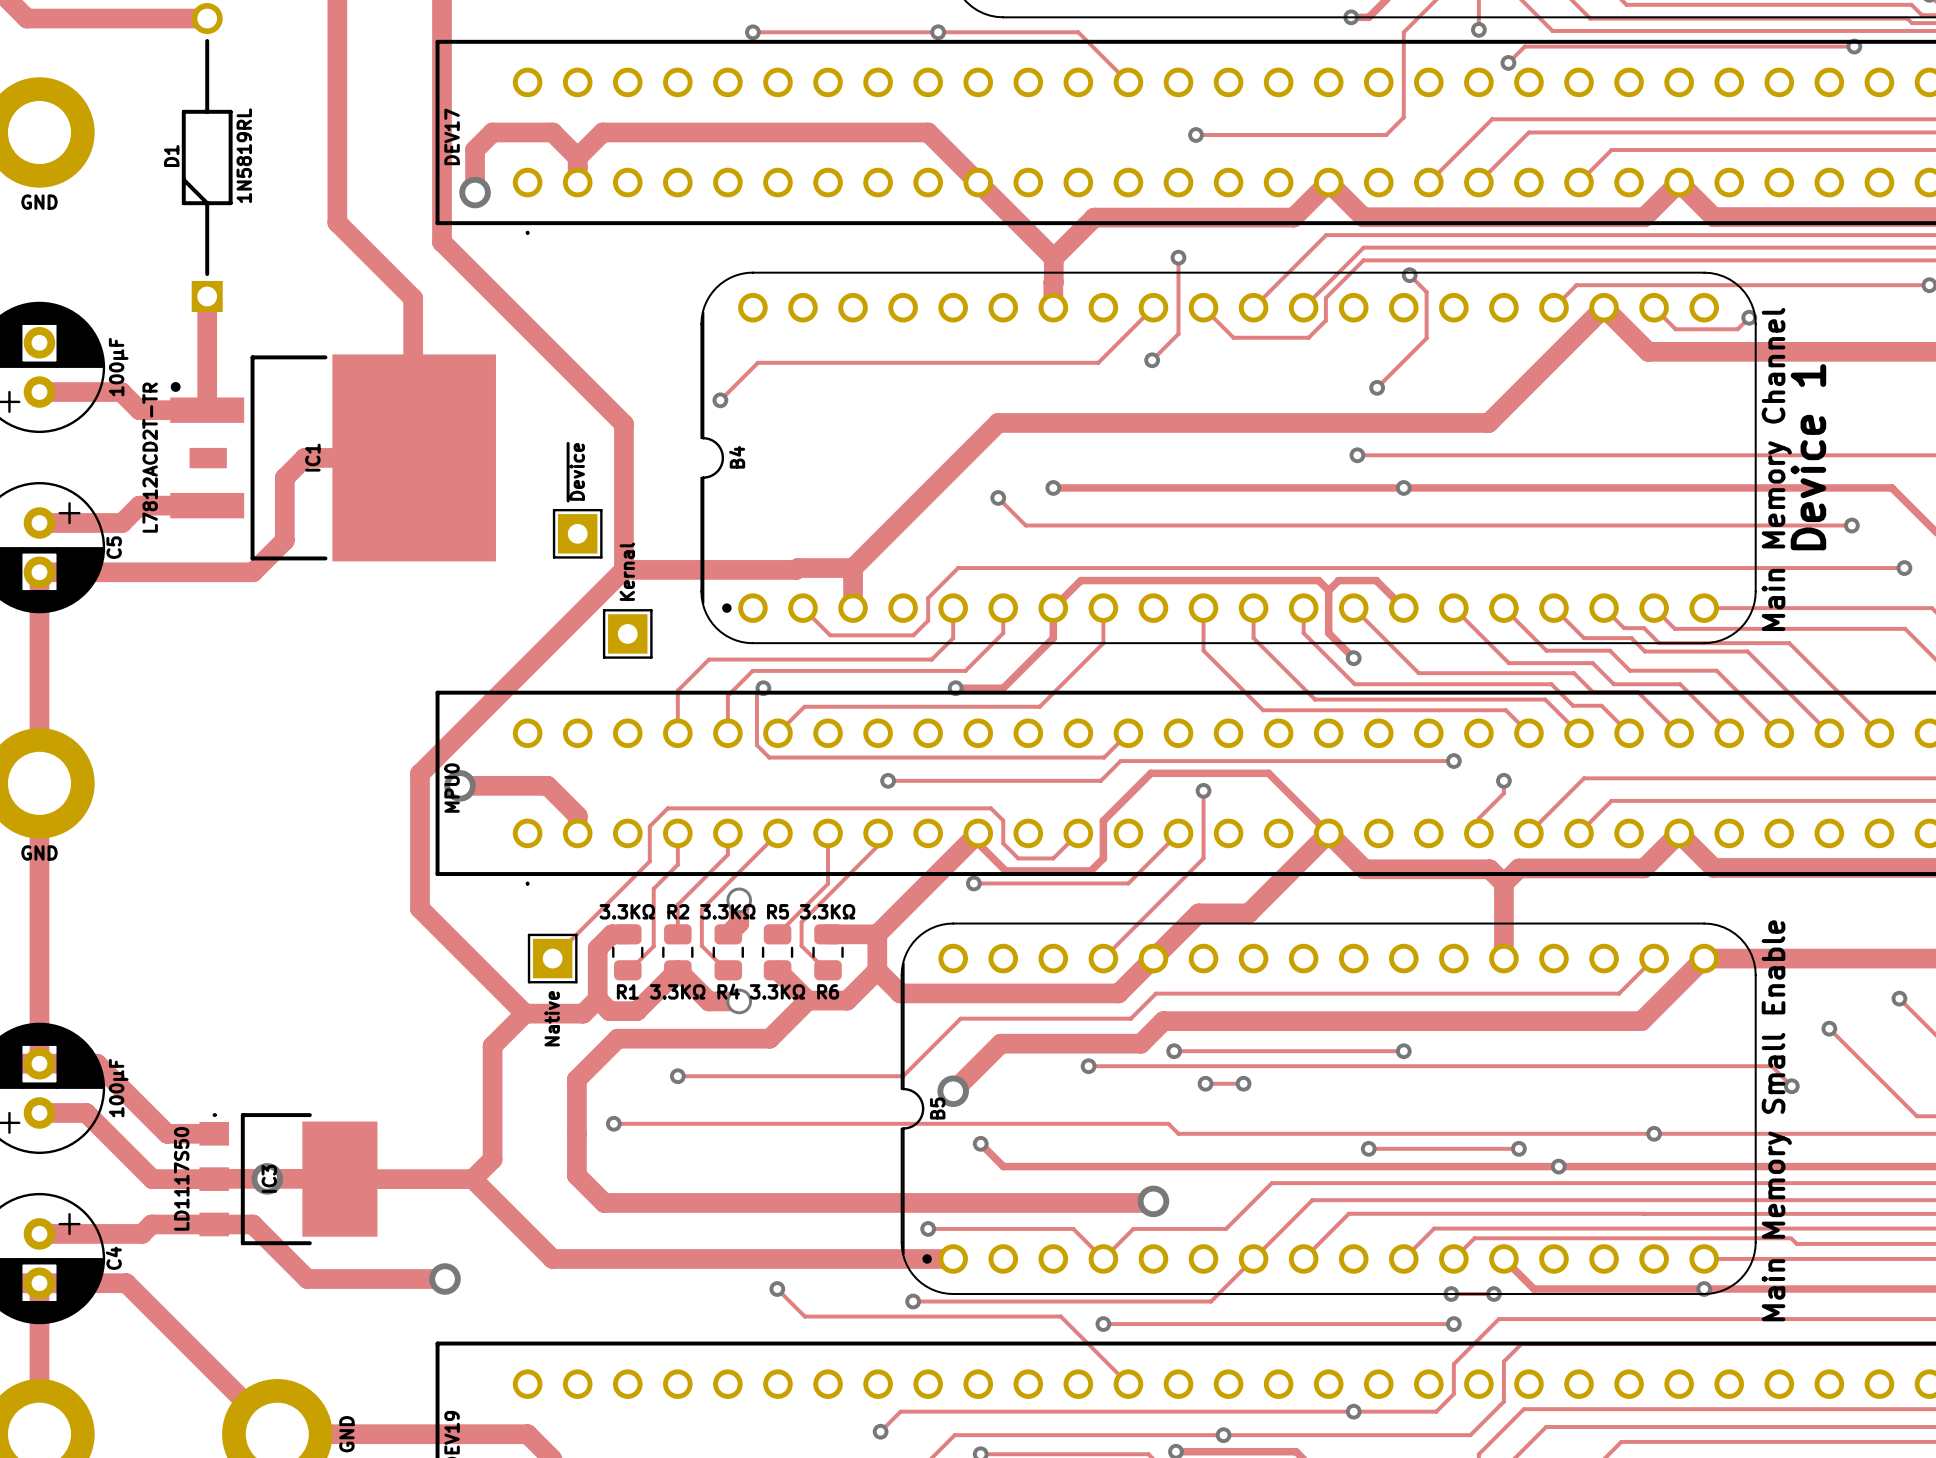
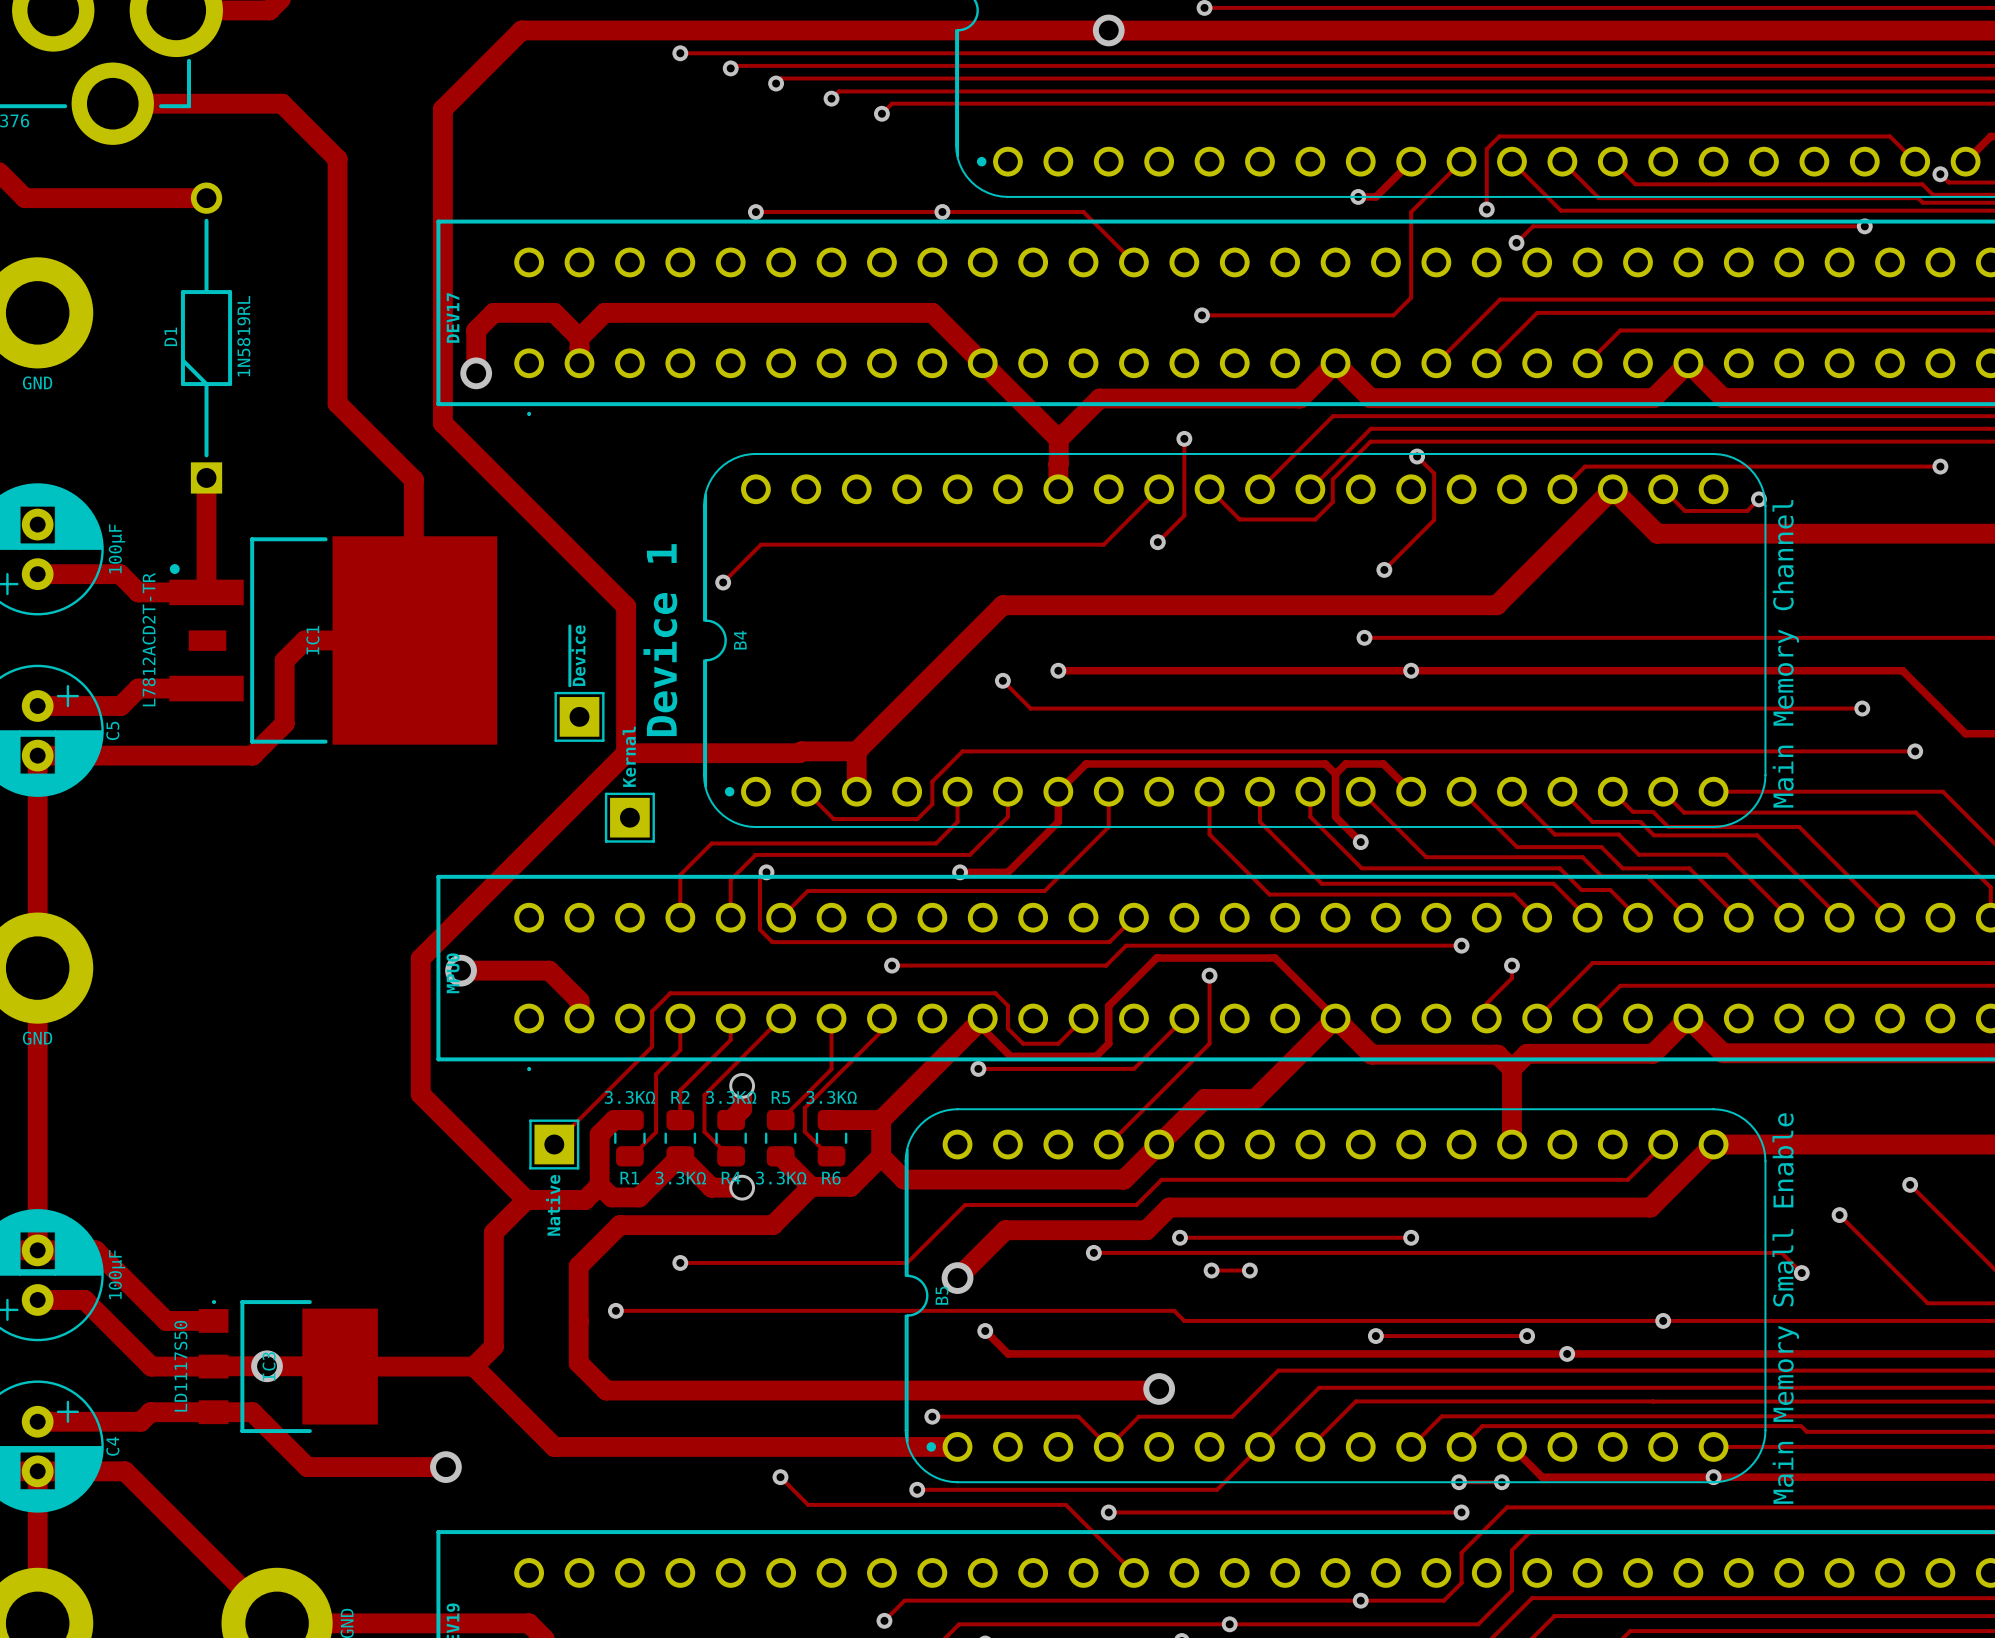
text: none -> Device 1 (660, 640)
text: Device 1 (1808, 457) -> none

